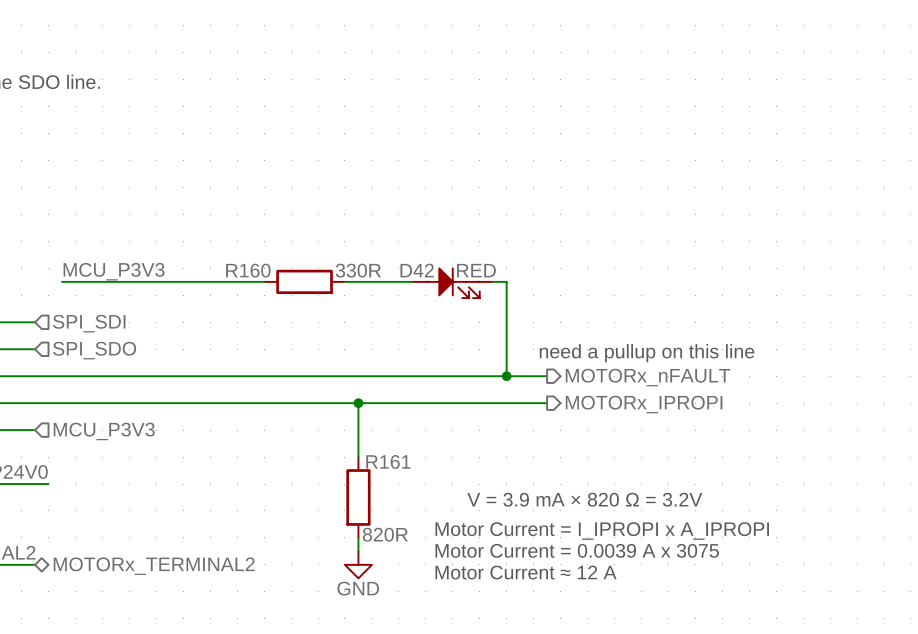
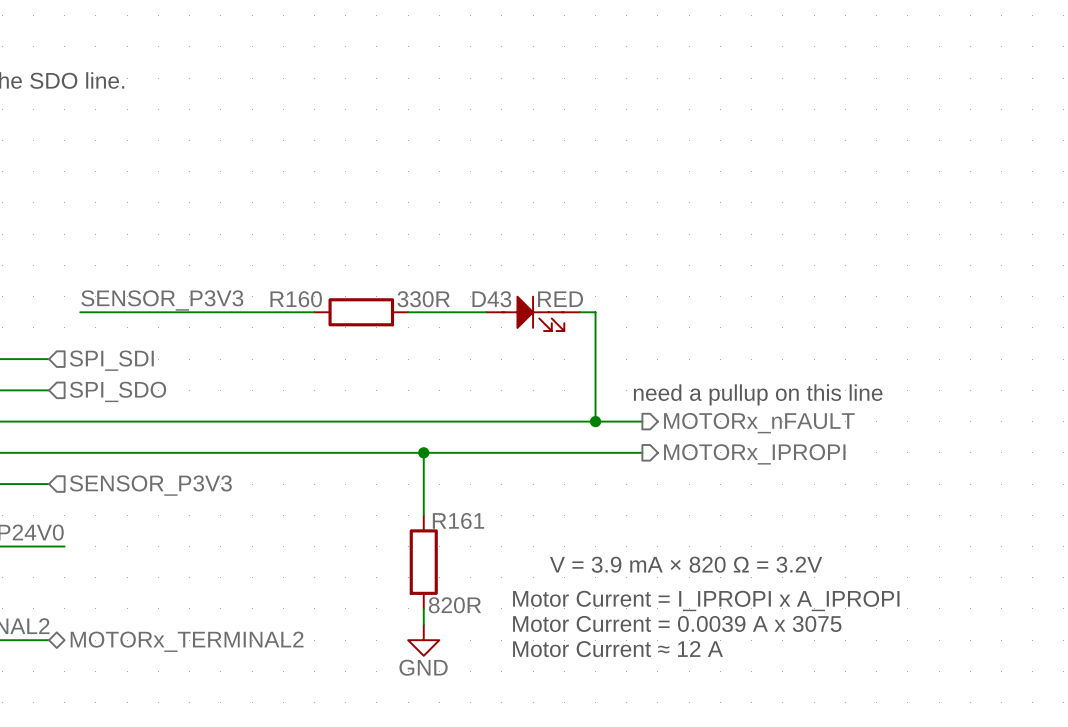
D42 name: D42 (417, 270) -> D43 (491, 299)
label: MCU_P3V3 (114, 271) -> SENSOR_P3V3 (162, 300)
hierarchical label: MCU_P3V3 (104, 431) -> SENSOR_P3V3 (150, 485)

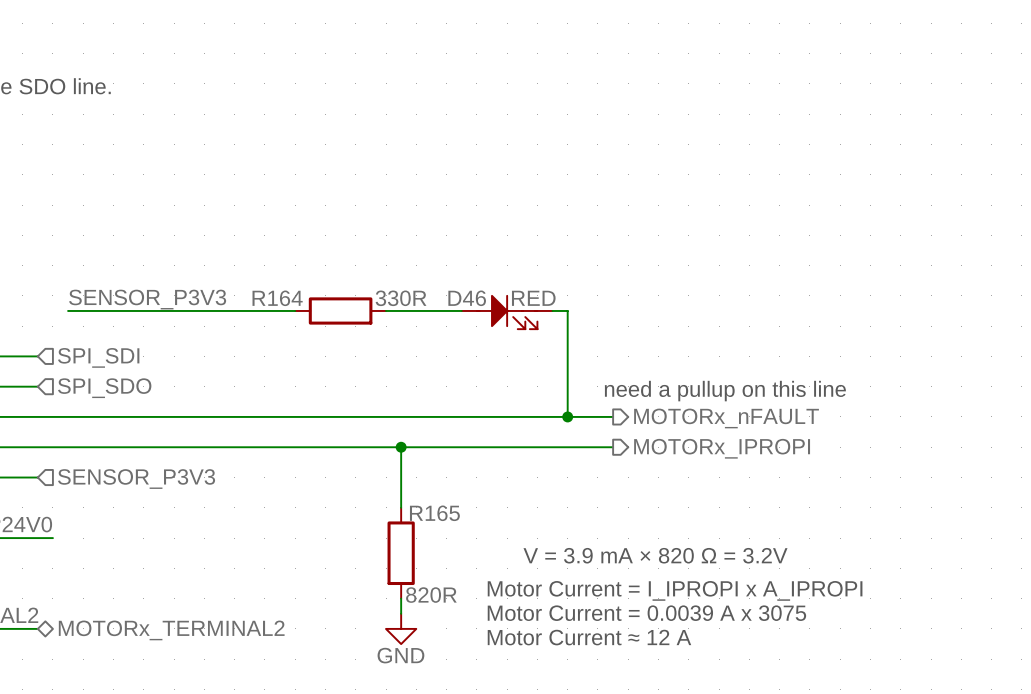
R160 name: R160 (296, 299) -> R164 (277, 298)
D43 name: D43 (491, 299) -> D46 (467, 298)
R161 name: R161 (458, 520) -> R165 (434, 513)

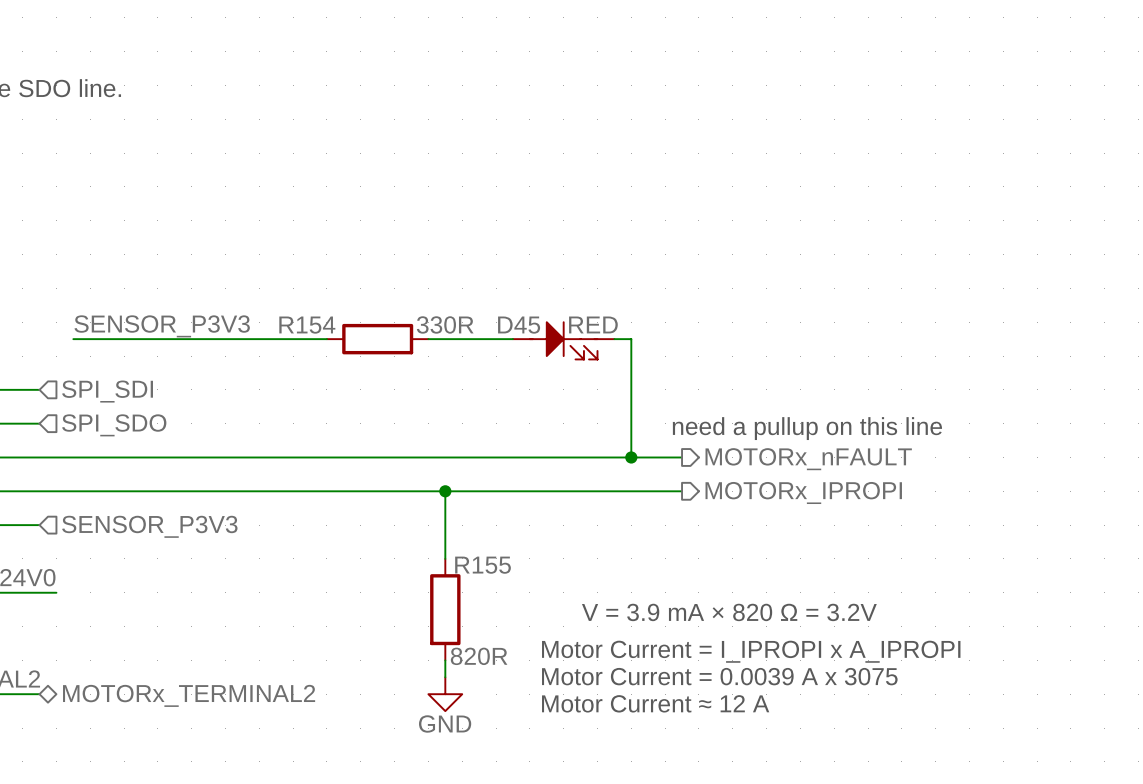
R164 name: R164 (277, 298) -> R154 (307, 325)
D46 name: D46 (467, 298) -> D45 (519, 325)
R165 name: R165 (434, 513) -> R155 (483, 565)

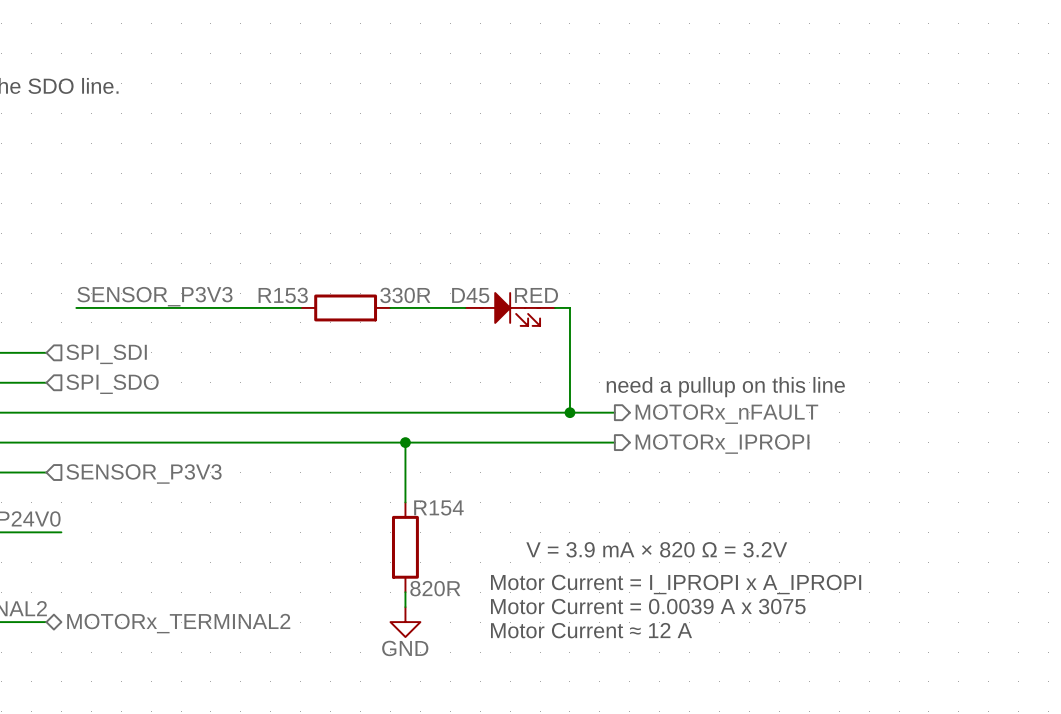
R154 name: R154 (307, 325) -> R153 (283, 295)
R155 name: R155 (483, 565) -> R154 (438, 507)

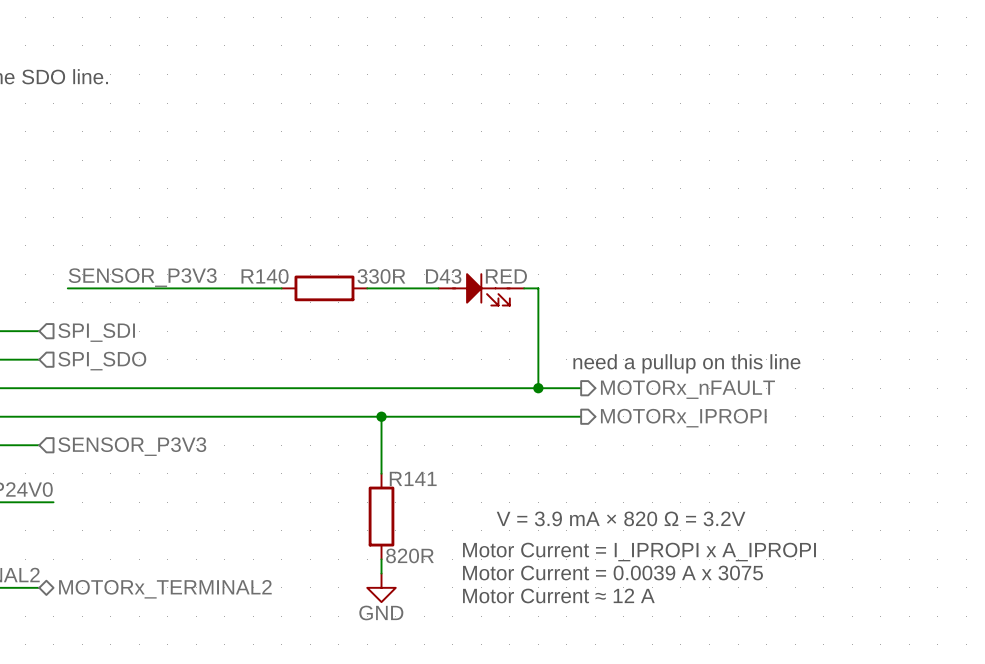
R153 name: R153 (283, 295) -> R140 (265, 276)
D45 name: D45 (470, 295) -> D43 (443, 276)
R154 name: R154 (438, 507) -> R141 (413, 478)

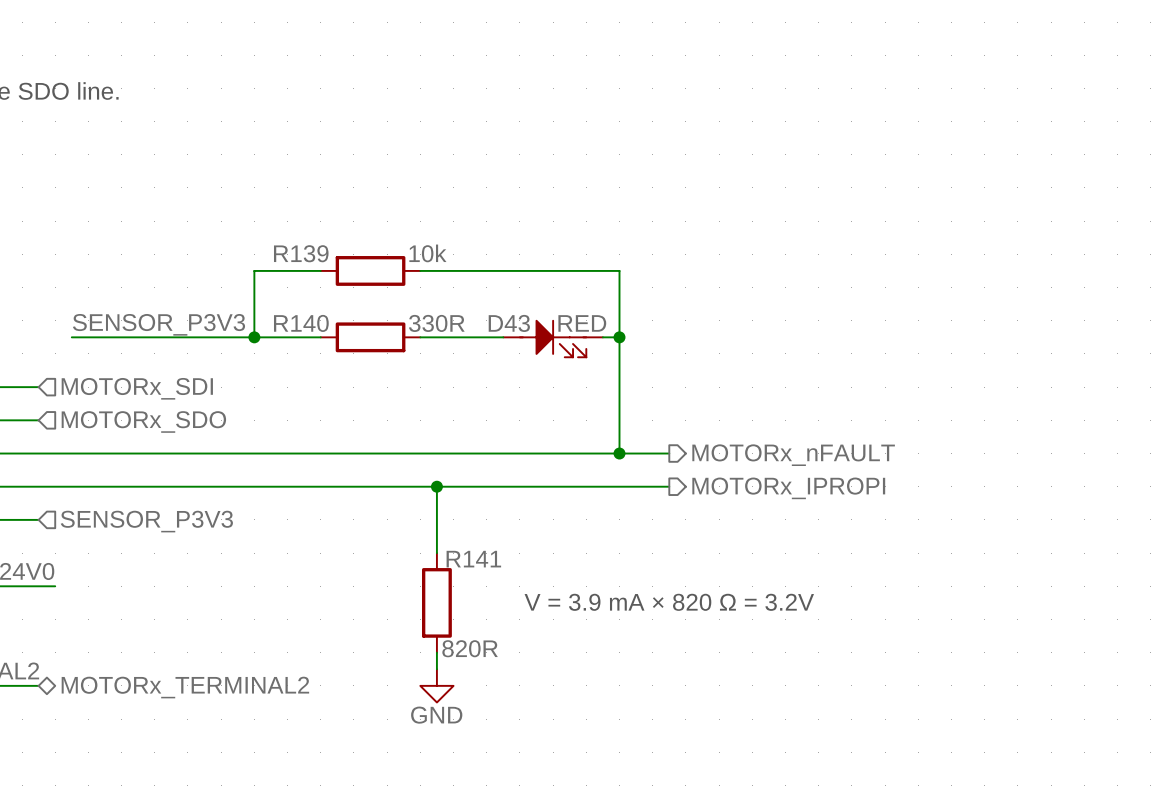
wire: none -> (320, 270) (254, 270) (254, 337)
R139: none -> 10k (370, 270)
wire: none -> (420, 270) (619, 270) (619, 337)
junction: none -> (254, 337)
junction: none -> (619, 337)
hierarchical label: SPI_SDI (96, 332) -> MOTORx_SDI (137, 388)
hierarchical label: SPI_SDO (102, 361) -> MOTORx_SDO (143, 421)
text: need a pullup on this line (686, 363) -> none
text position: V = 3.9 mA × 820 Ω = 3.2V (621, 518) -> V = 3.9 mA × 820 Ω = 3.2V (669, 602)
text: Motor Current = I_IPROPI x A_IPROPI (639, 552) -> none
text: Motor Current = 0.0039 A x 3075 (613, 573) -> none
text: Motor Current ≈ 12 A (558, 595) -> none

